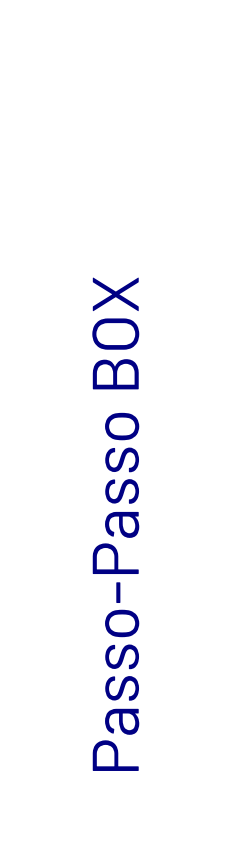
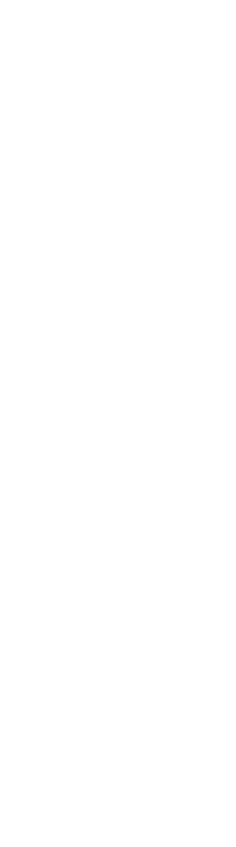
text: Passo-Passo BOX (115, 524) -> none

